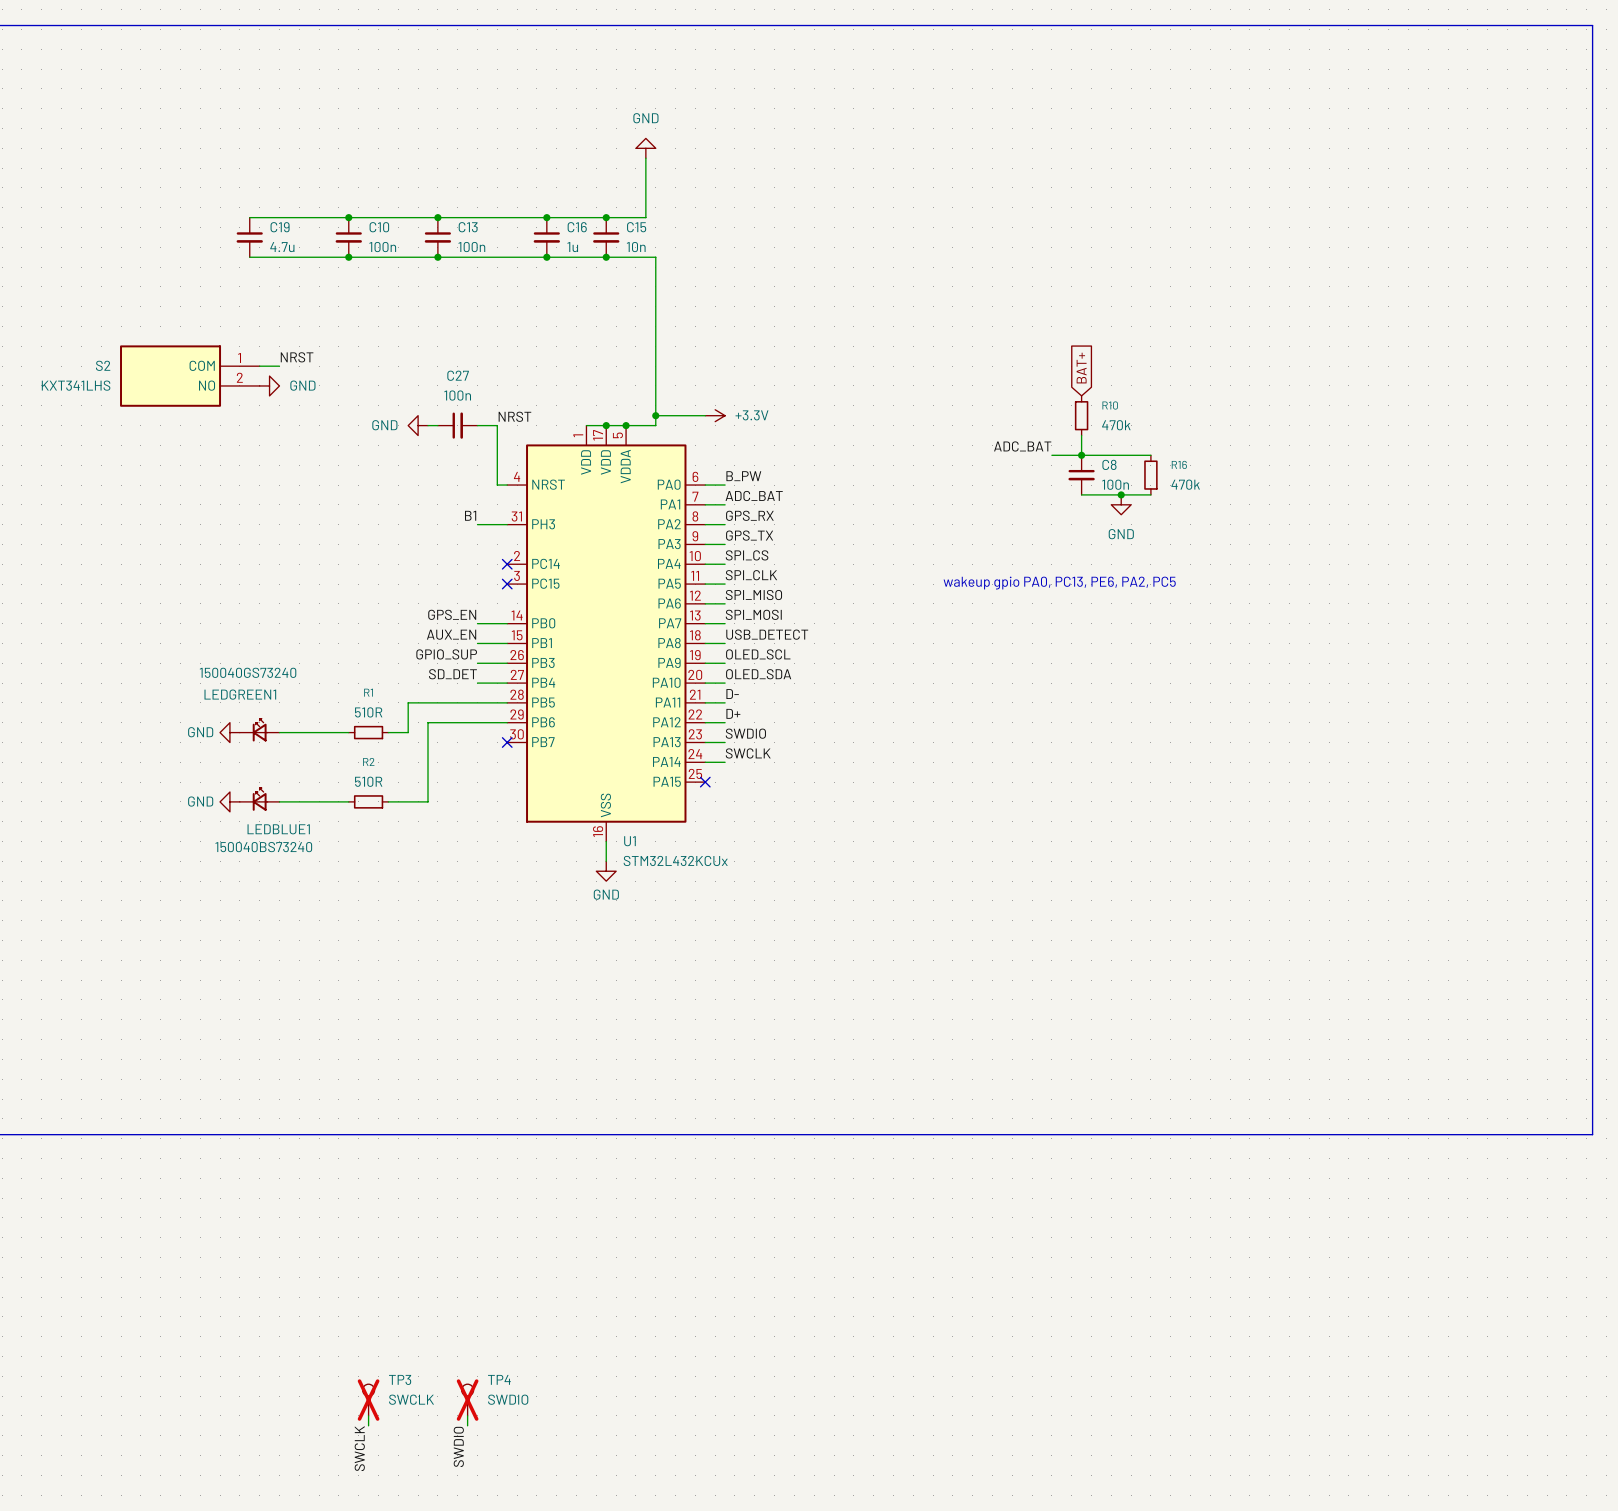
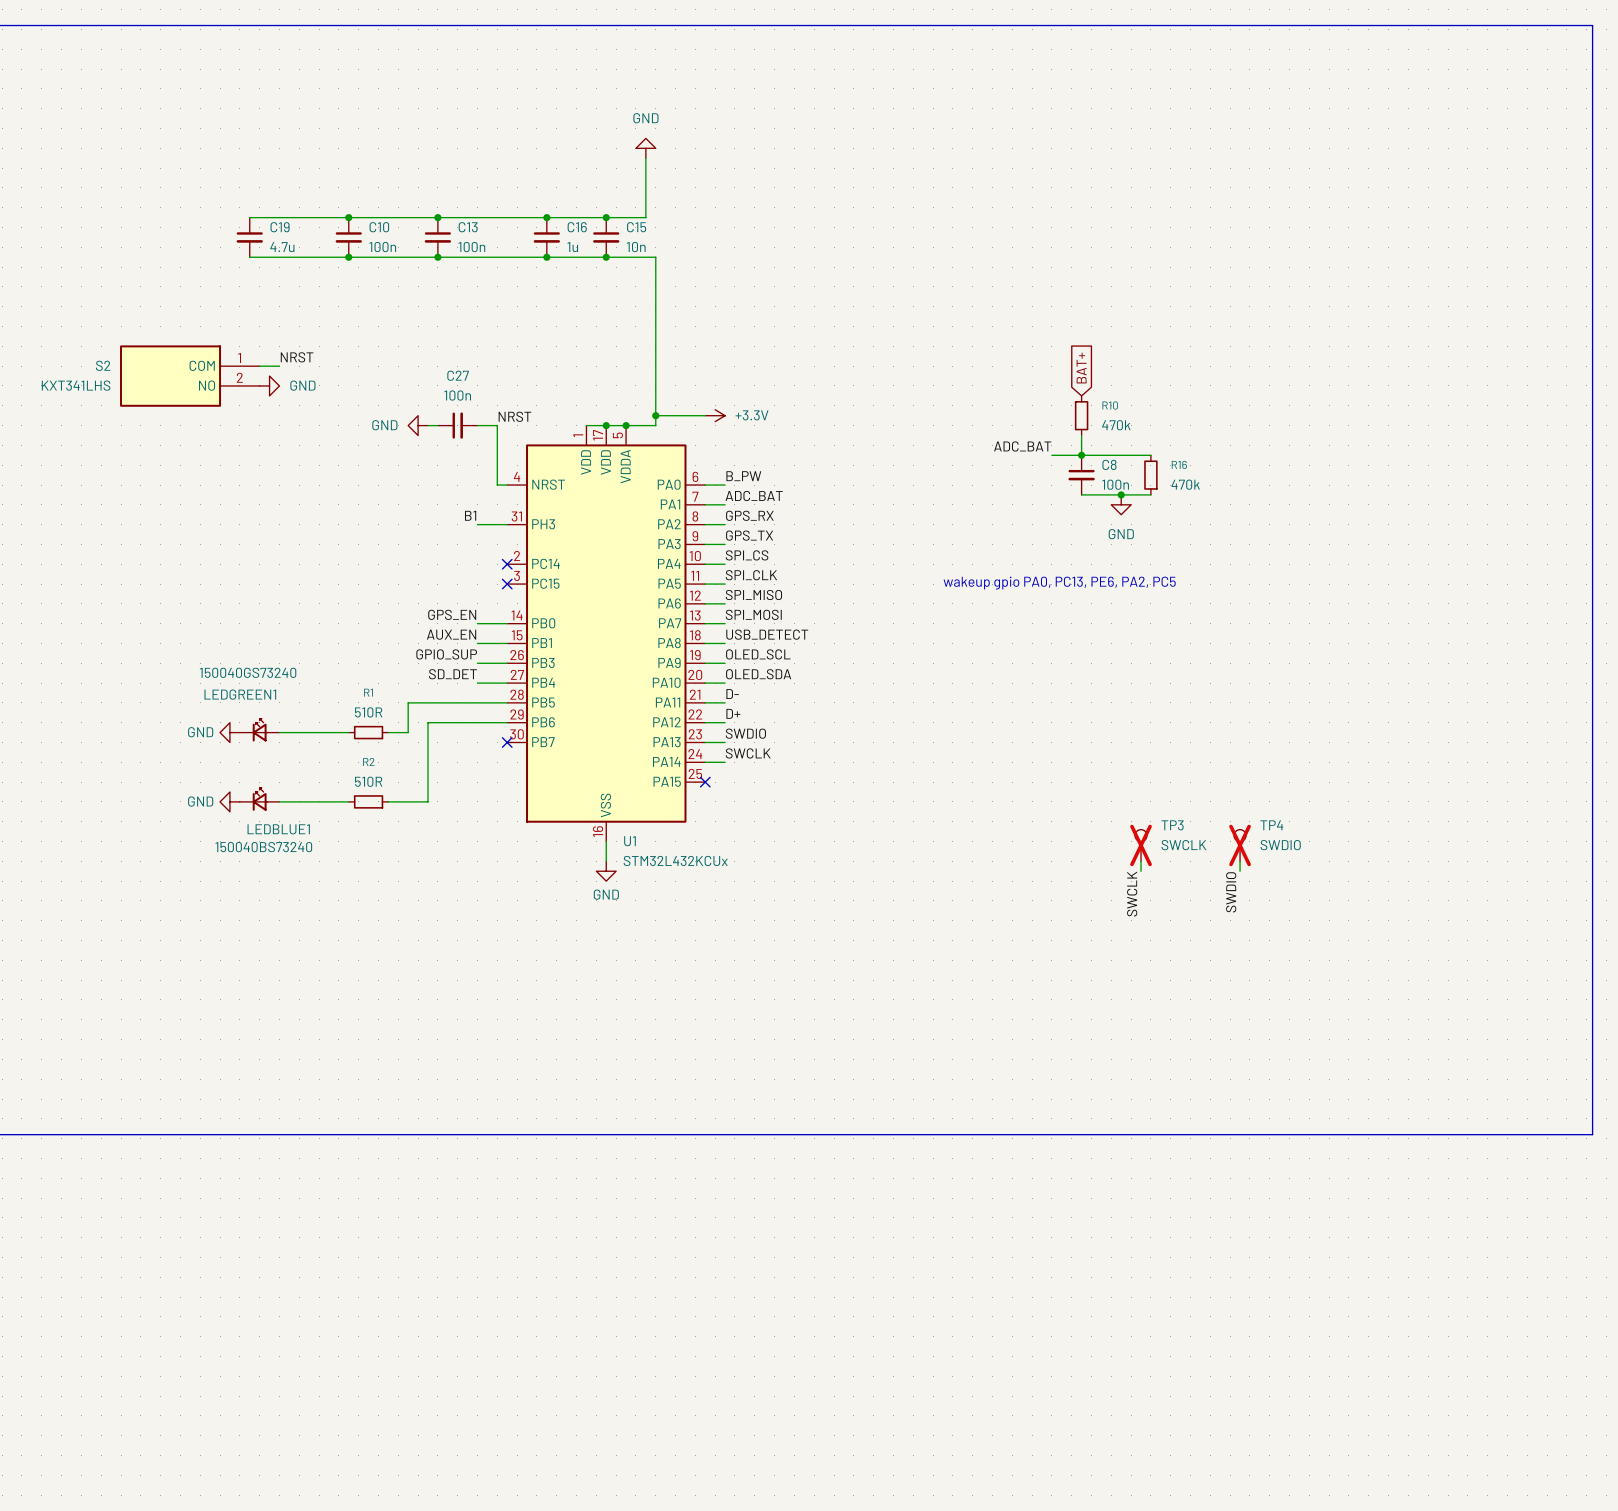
wire: none -> (1141, 861) (1141, 871)
wire: none -> (1240, 861) (1240, 871)
label: none -> SWDIO (1231, 892)
label: none -> SWCLK (1132, 894)
TP3 position: (368, 1400) -> (1141, 845)
TP4 position: (467, 1400) -> (1240, 845)
wire: (368, 1415) (368, 1425) -> none
wire: (467, 1415) (467, 1425) -> none
label: SWDIO (458, 1446) -> none
label: SWCLK (359, 1448) -> none

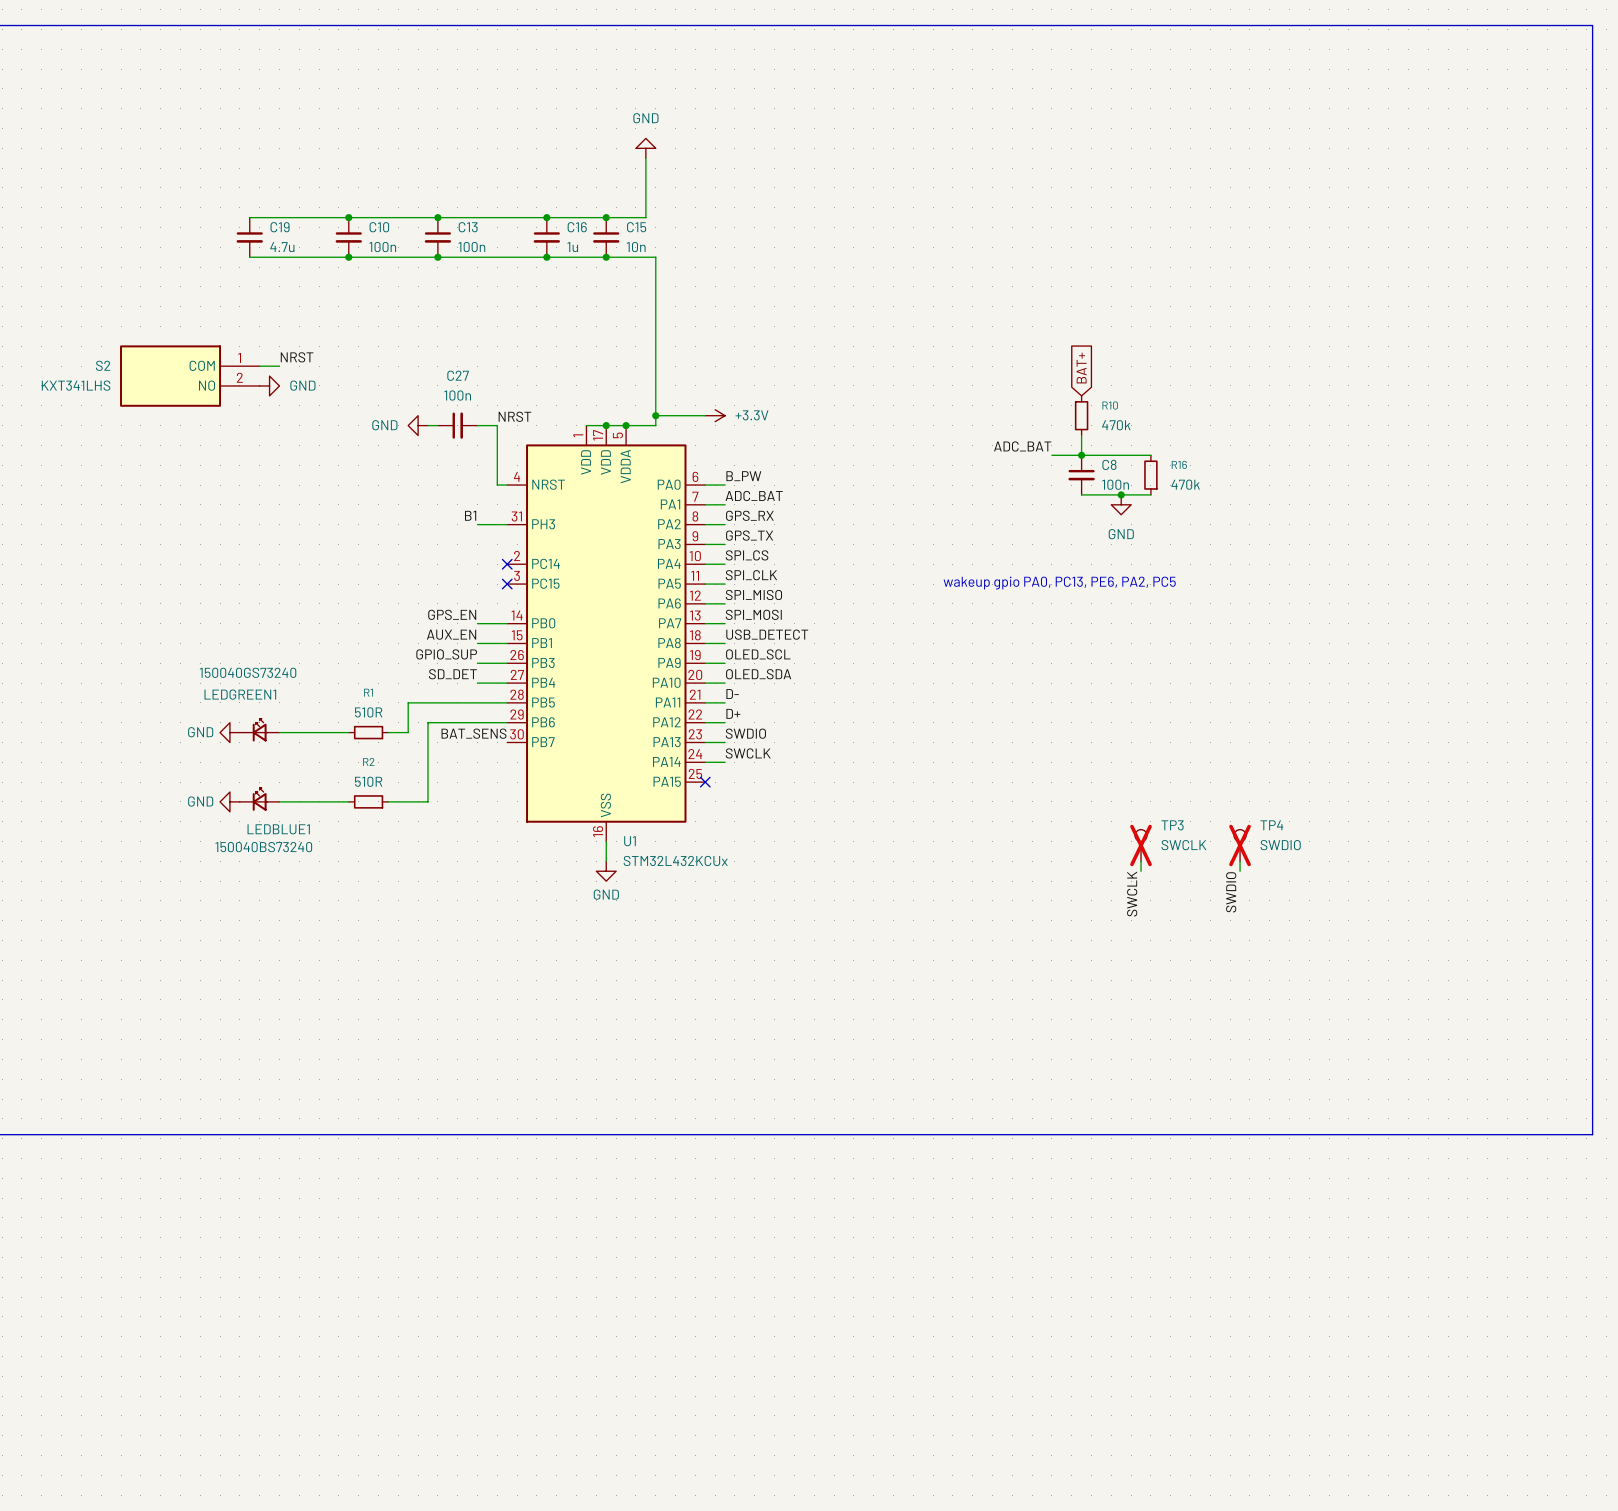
label: none -> BAT_SENS (474, 733)
no-connect mark: (507, 742) -> none

